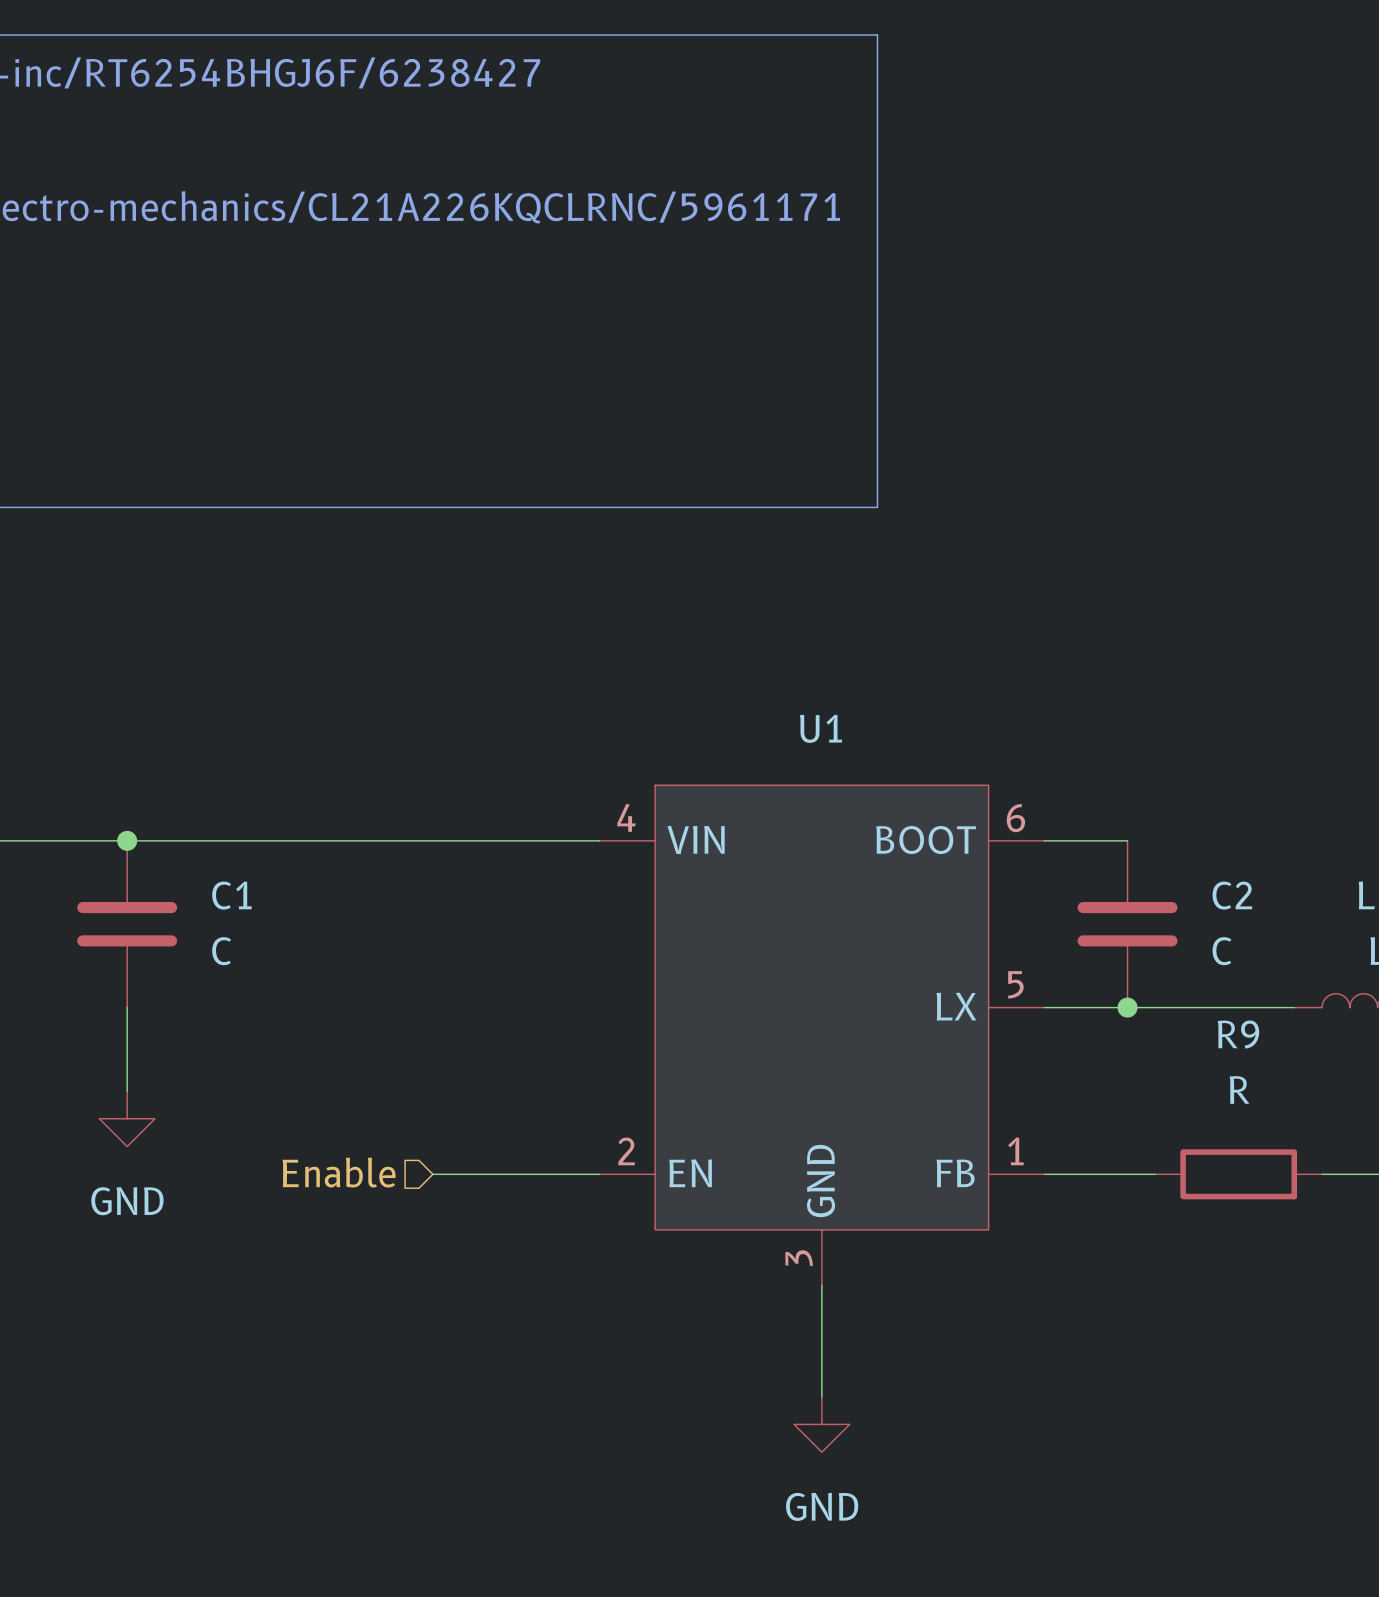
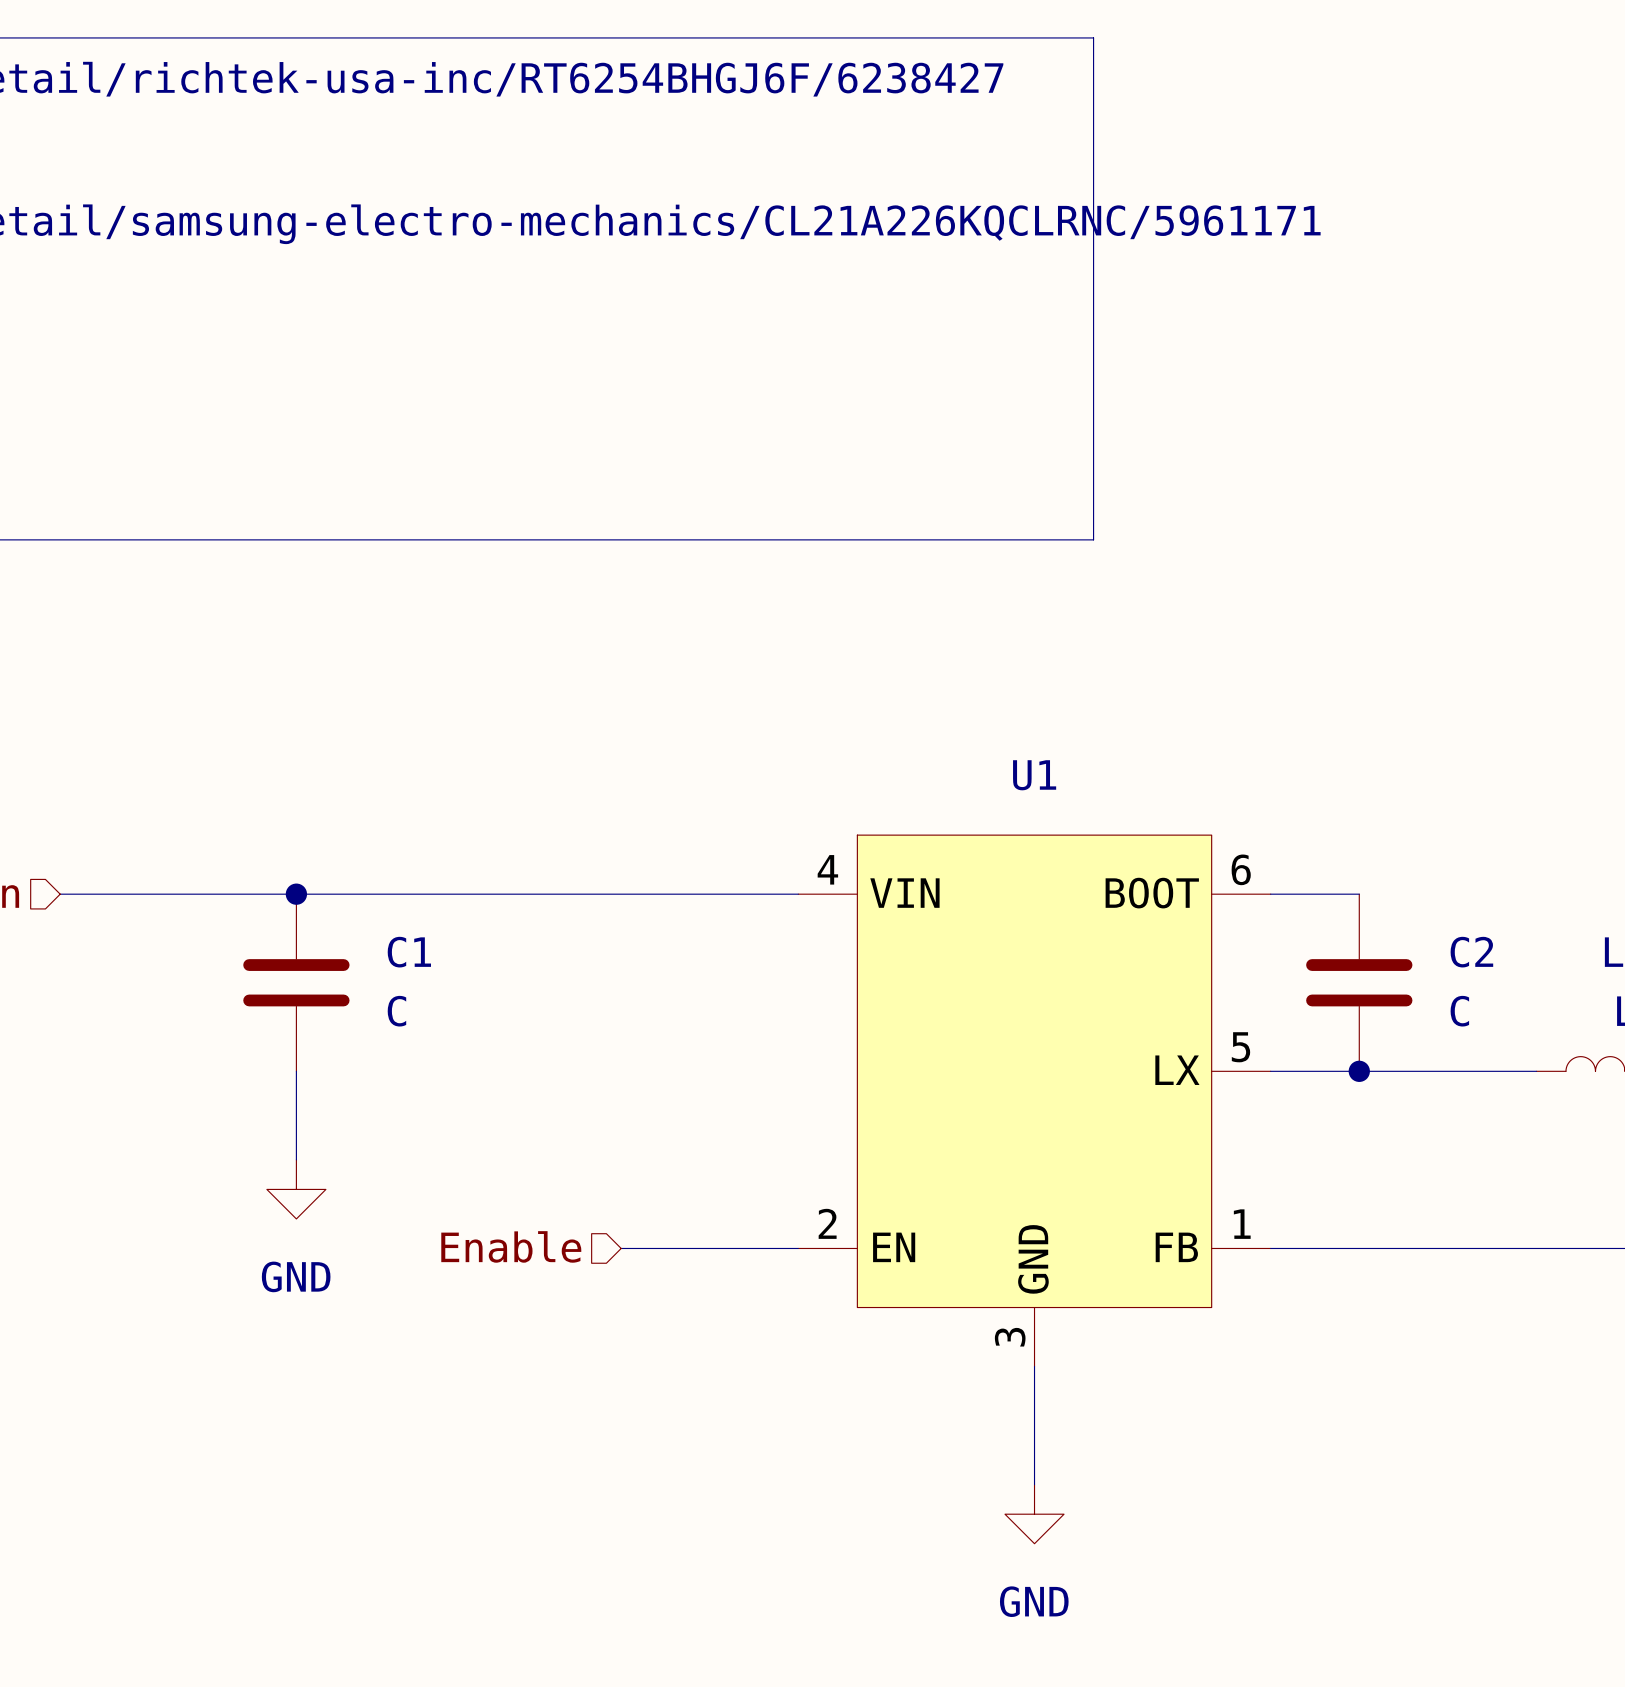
wire: none -> (1388, 1248) (1565, 1248)
R9: R (1238, 1174) -> none

